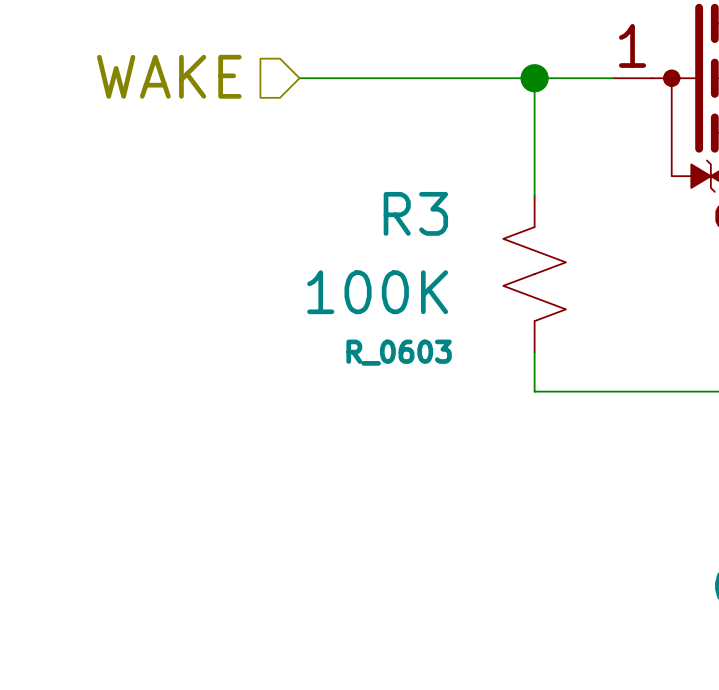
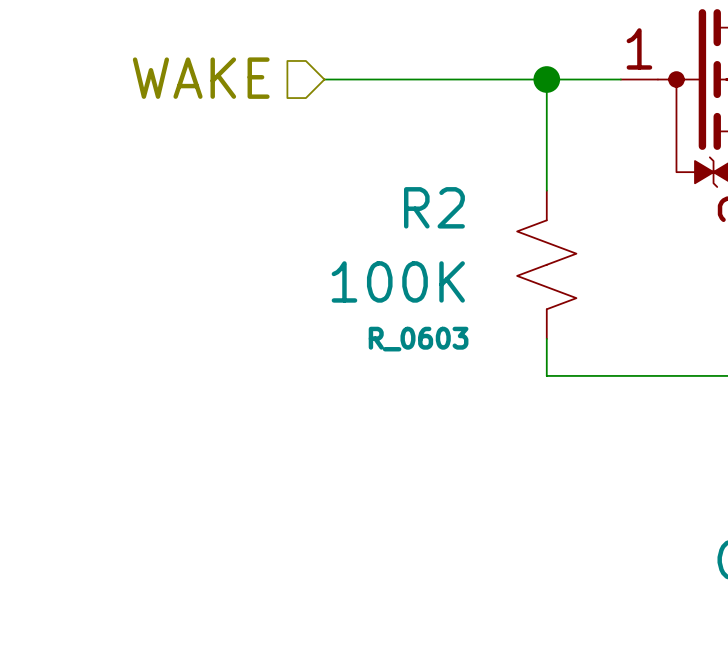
R3 name: R3 (415, 213) -> R2 (434, 207)

